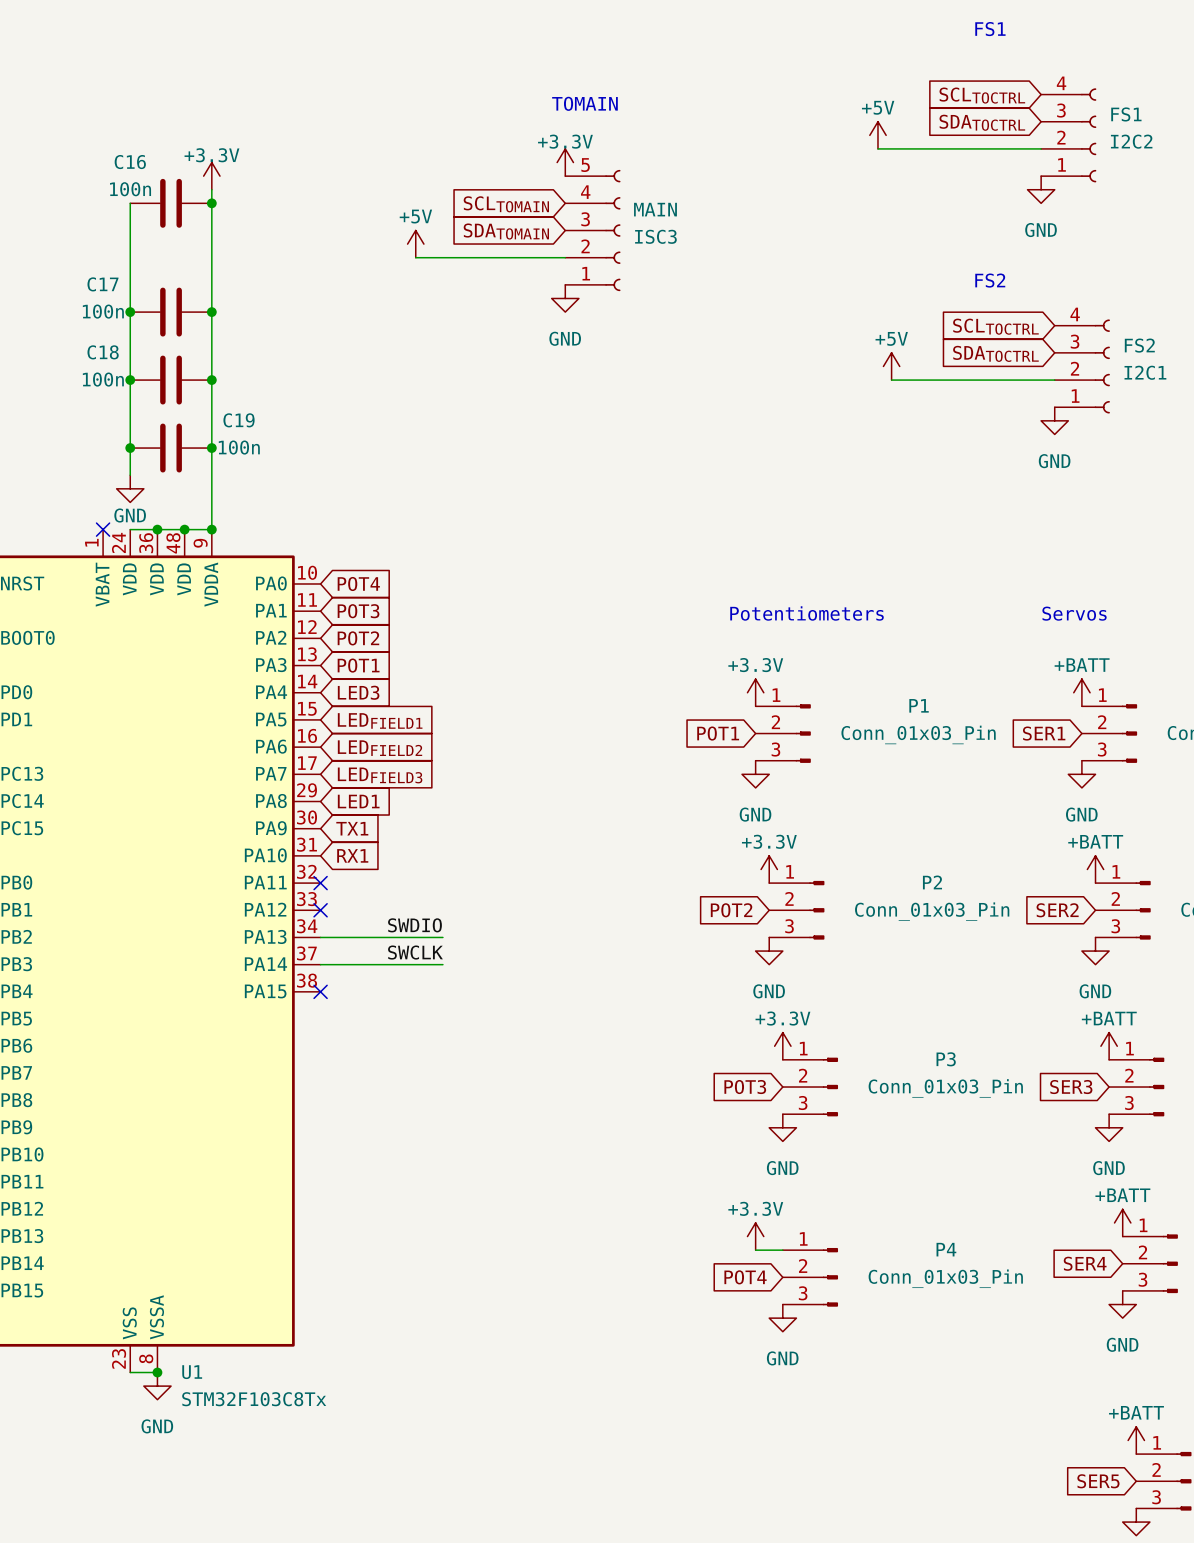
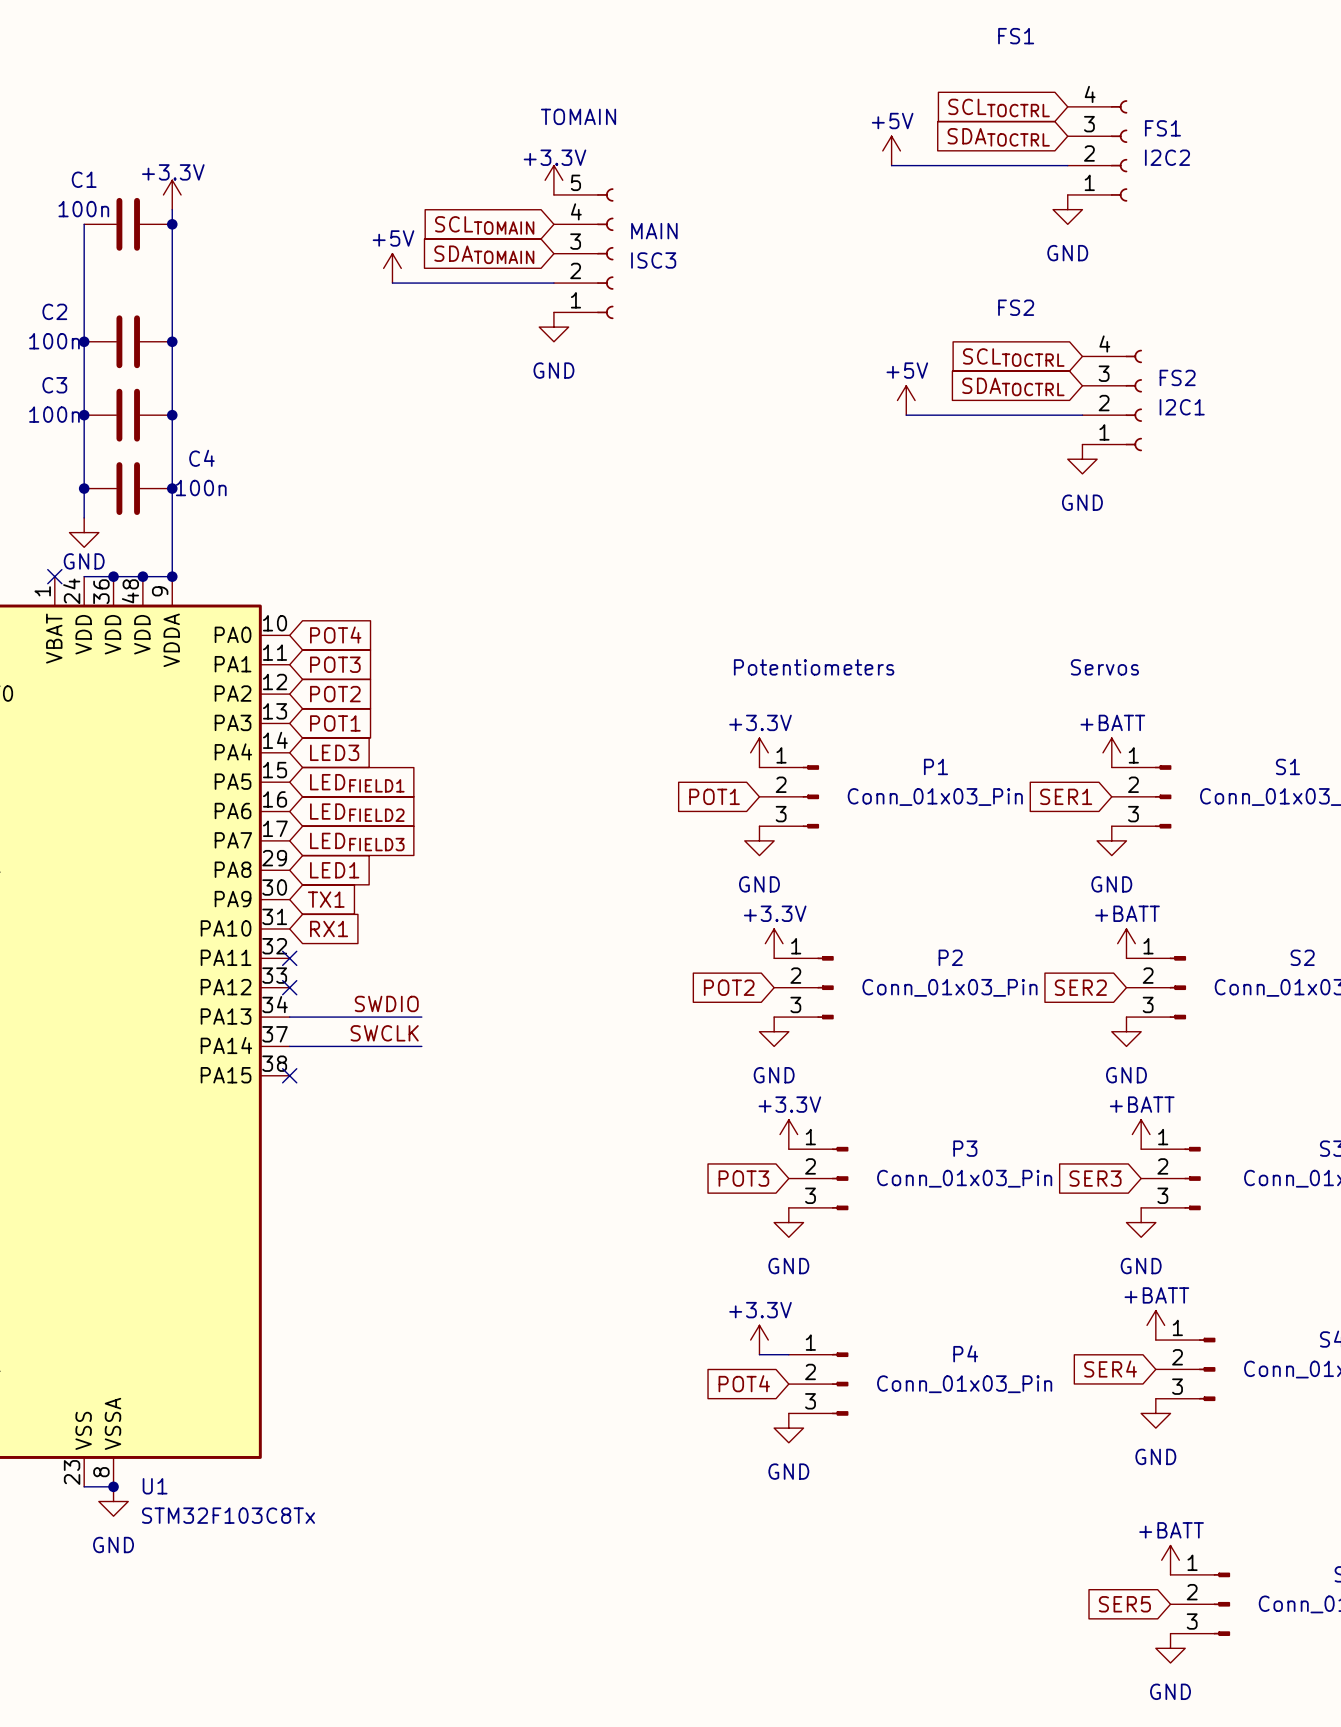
C16 name: C16 (130, 162) -> C1 (84, 179)
C17 name: C17 (102, 284) -> C2 (54, 311)
C18 name: C18 (103, 352) -> C3 (54, 385)
C19 name: C19 (239, 420) -> C4 (201, 458)

